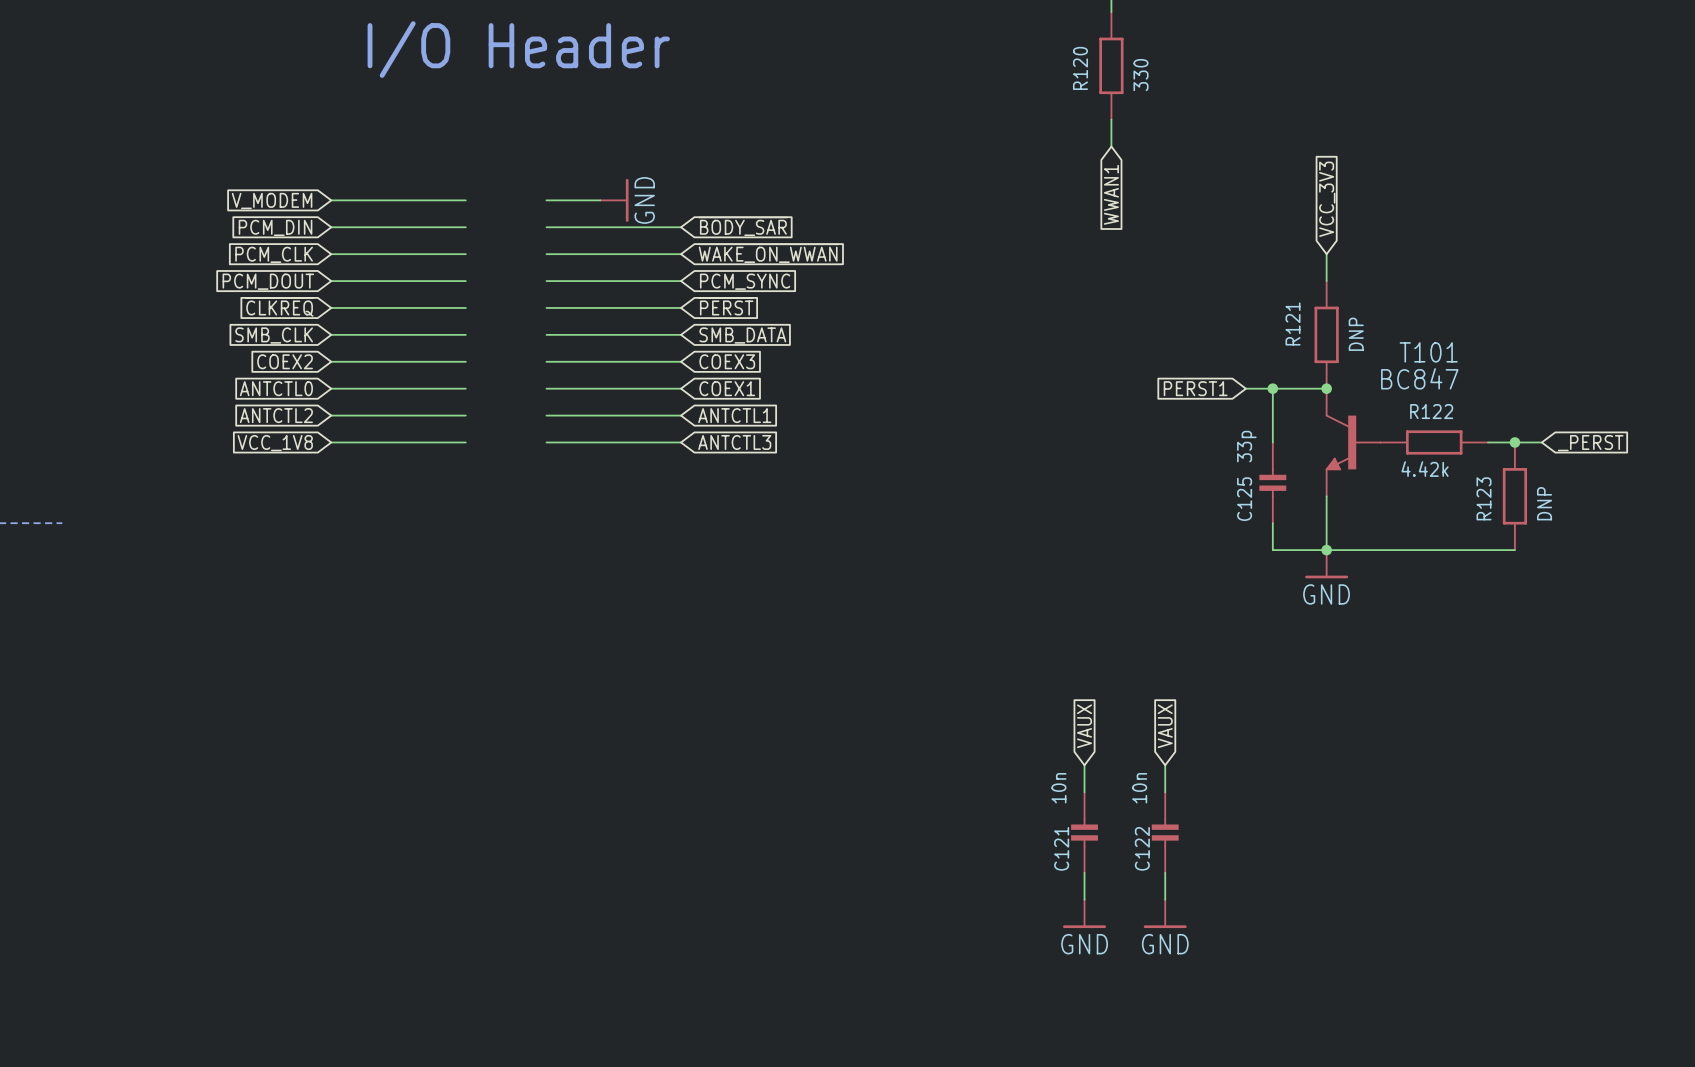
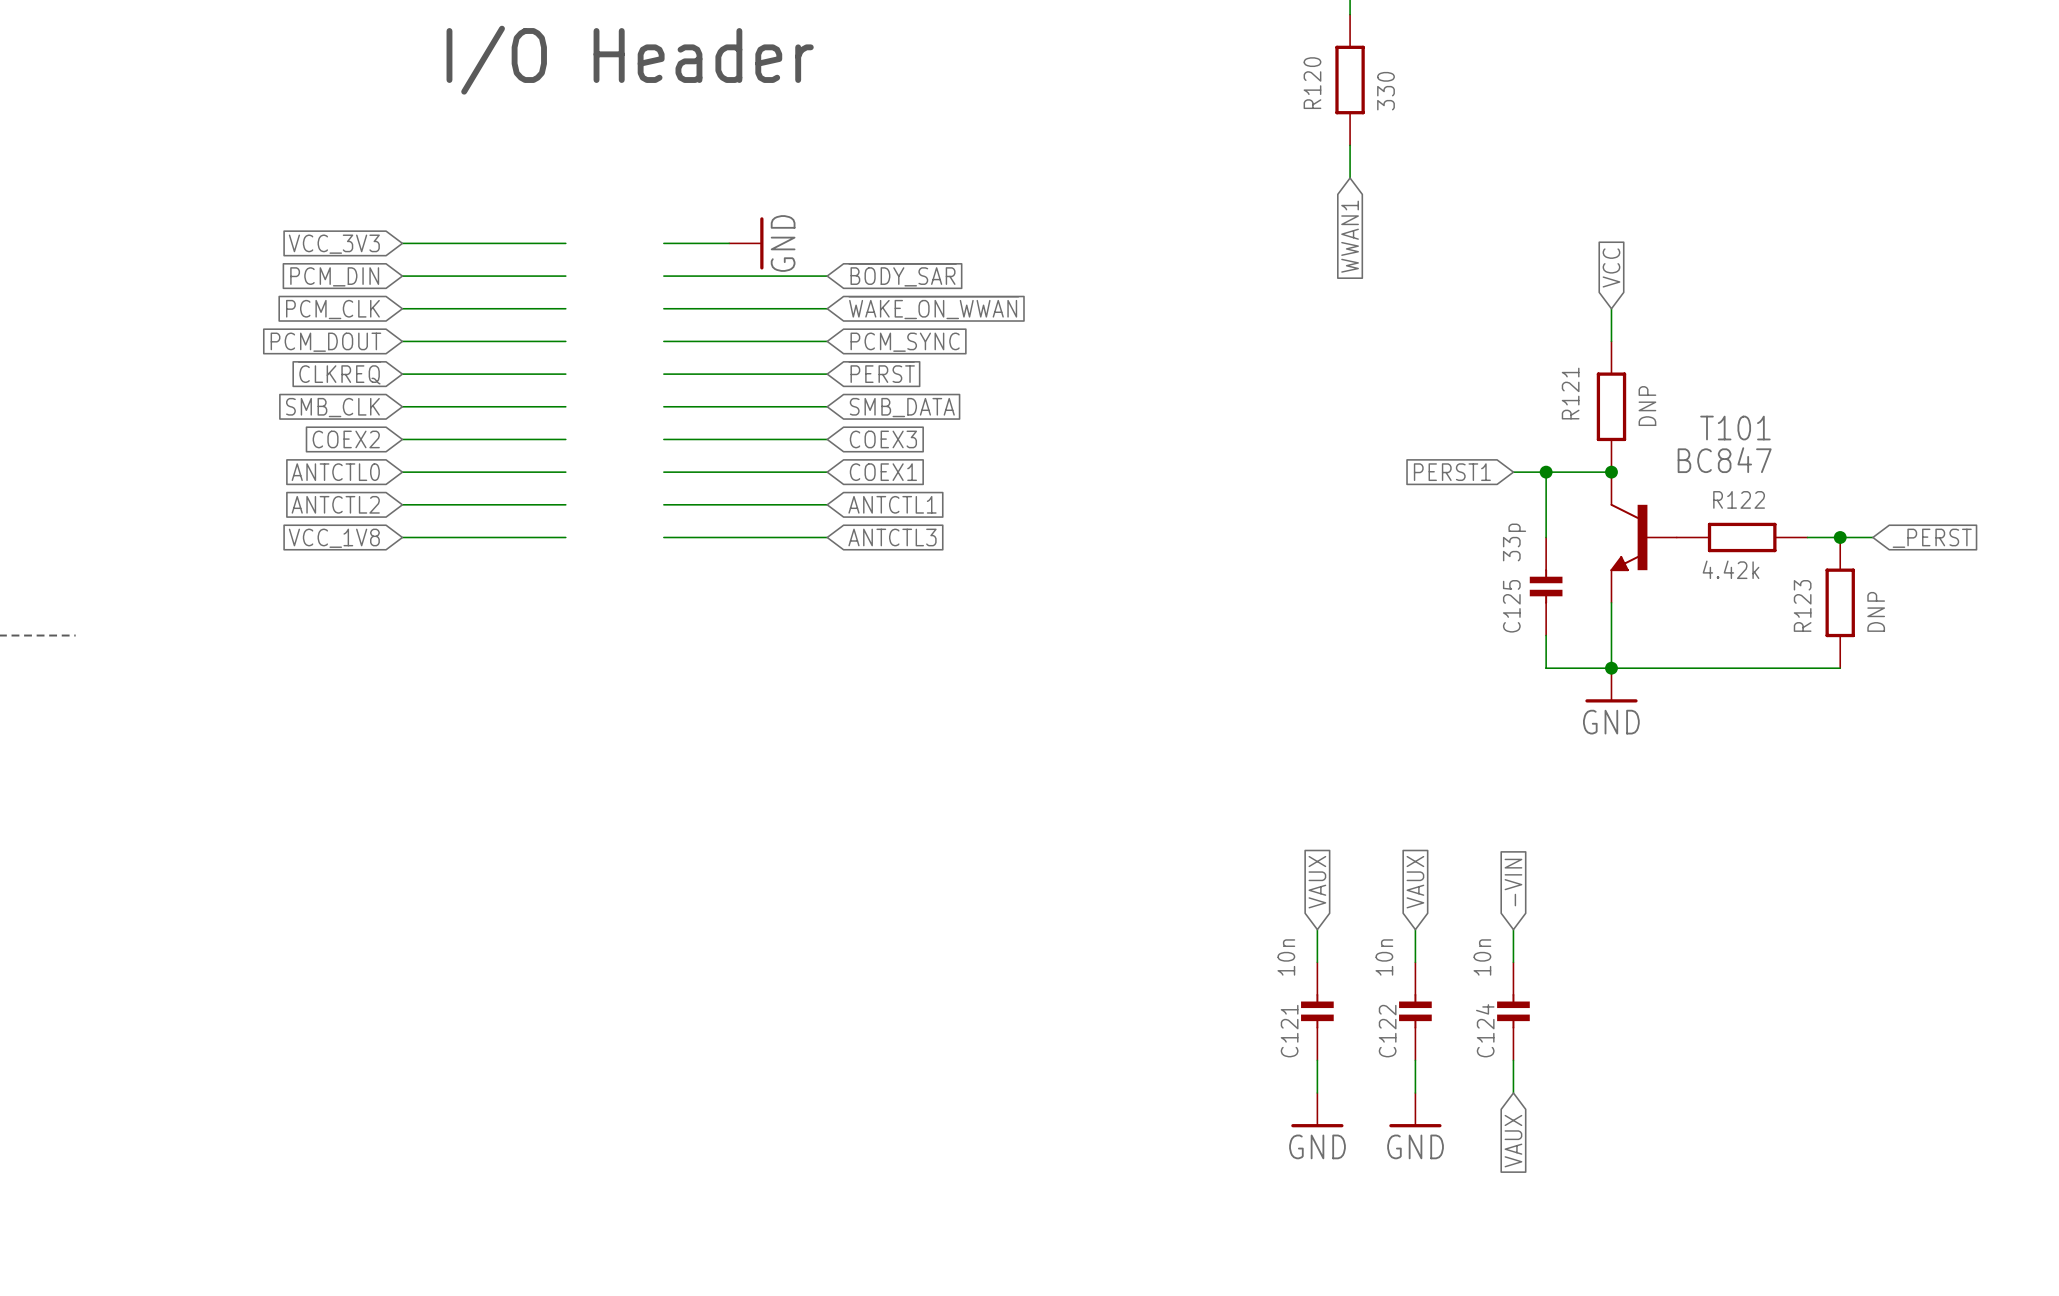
global label: VCC_3V3 (1327, 199) -> VCC (1611, 267)
global label: V_MODEM (272, 201) -> VCC_3V3 (334, 244)
global label: none -> -VIN (1513, 882)
wire: none -> (1513, 929) (1513, 962)
C124: none -> 10n (1513, 1011)
wire: none -> (1513, 1060) (1513, 1093)
global label: none -> VAUX (1513, 1141)

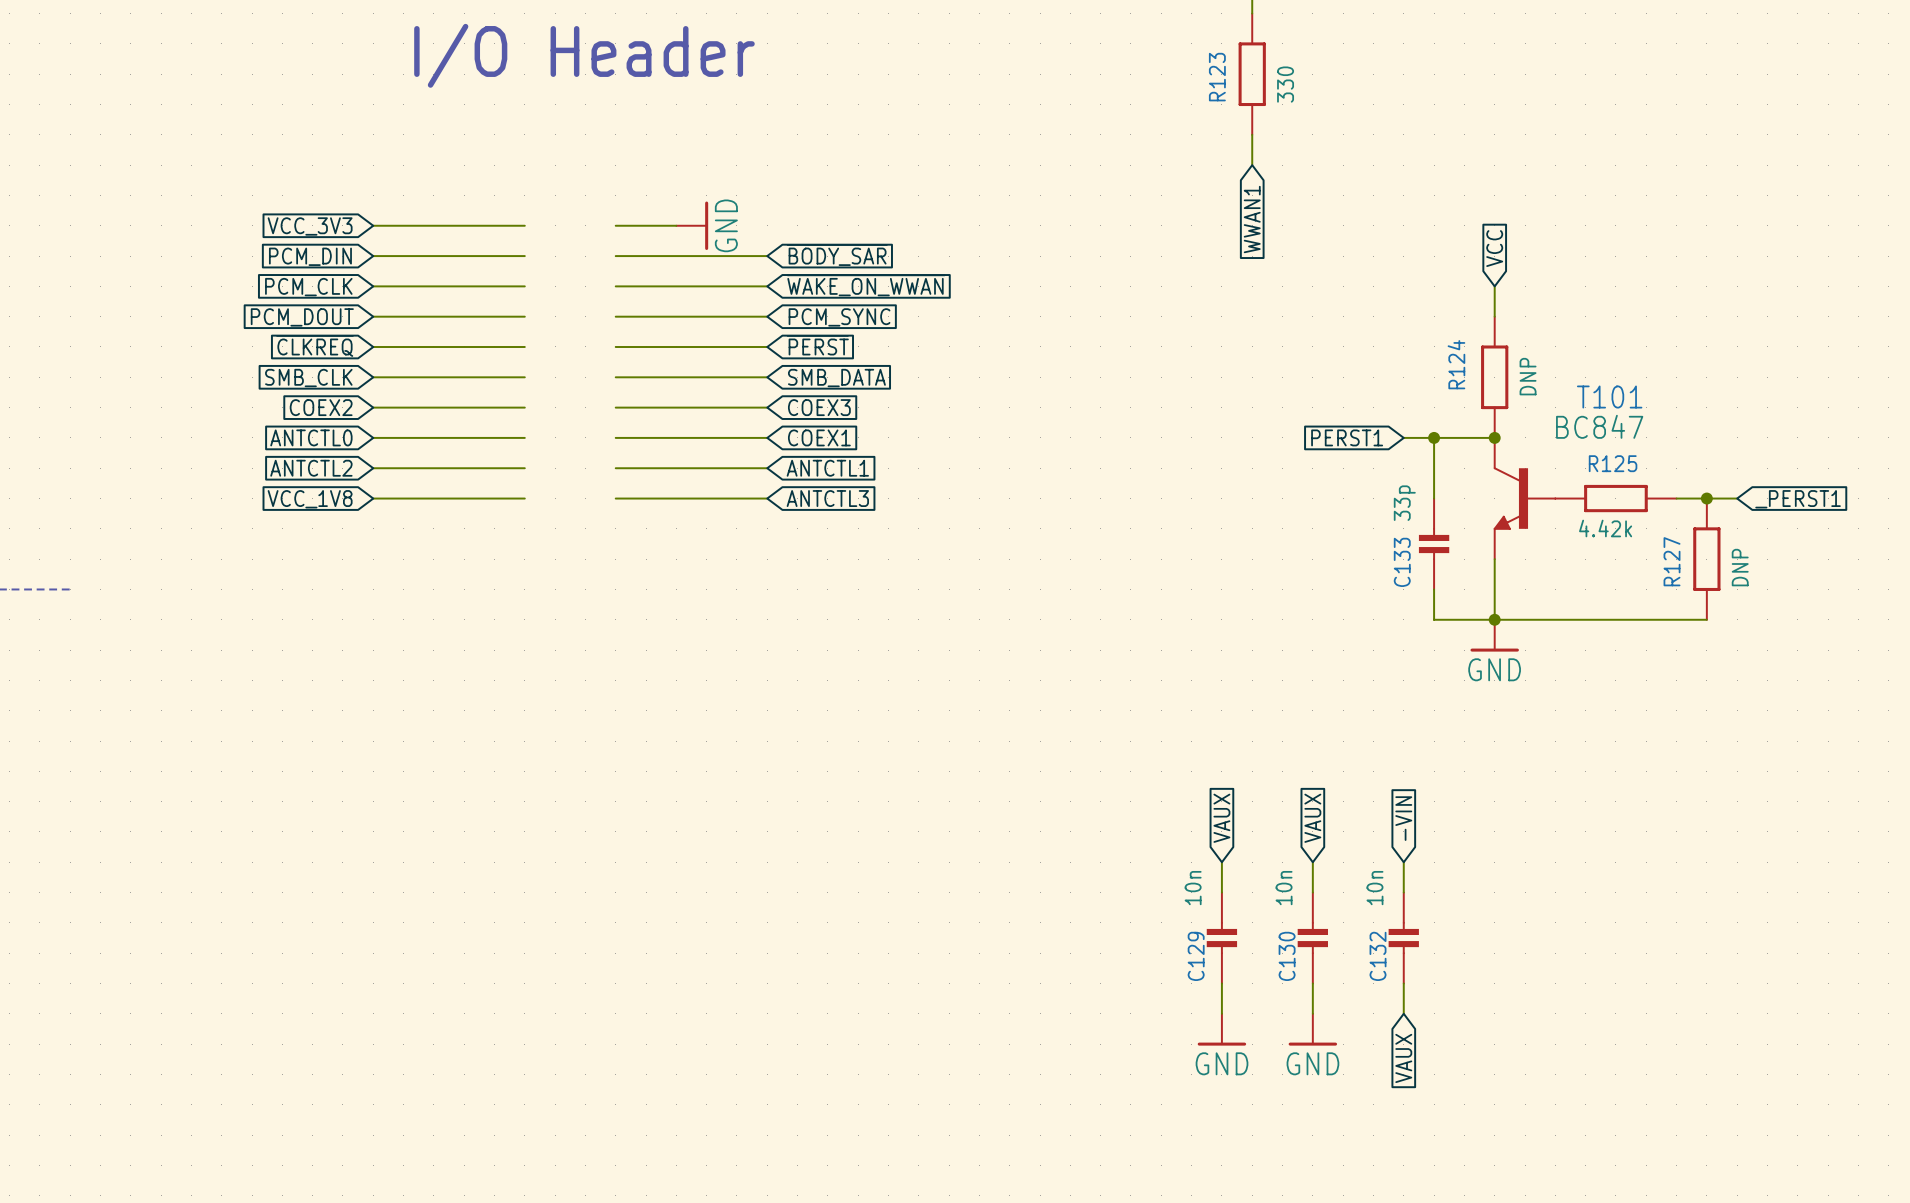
R120 name: R120 (1312, 83) -> R123 (1217, 77)
R121 name: R121 (1570, 393) -> R124 (1456, 364)
R122 name: R122 (1739, 499) -> R125 (1613, 463)
global label: _PERST (1932, 538) -> _PERST1 (1798, 499)
R123 name: R123 (1802, 605) -> R127 (1672, 561)
C125 name: C125 (1511, 606) -> C133 (1402, 562)
C124 name: C124 (1485, 1030) -> C132 (1378, 956)
C121 name: C121 (1289, 1031) -> C129 (1196, 956)
C122 name: C122 (1387, 1031) -> C130 (1287, 956)

